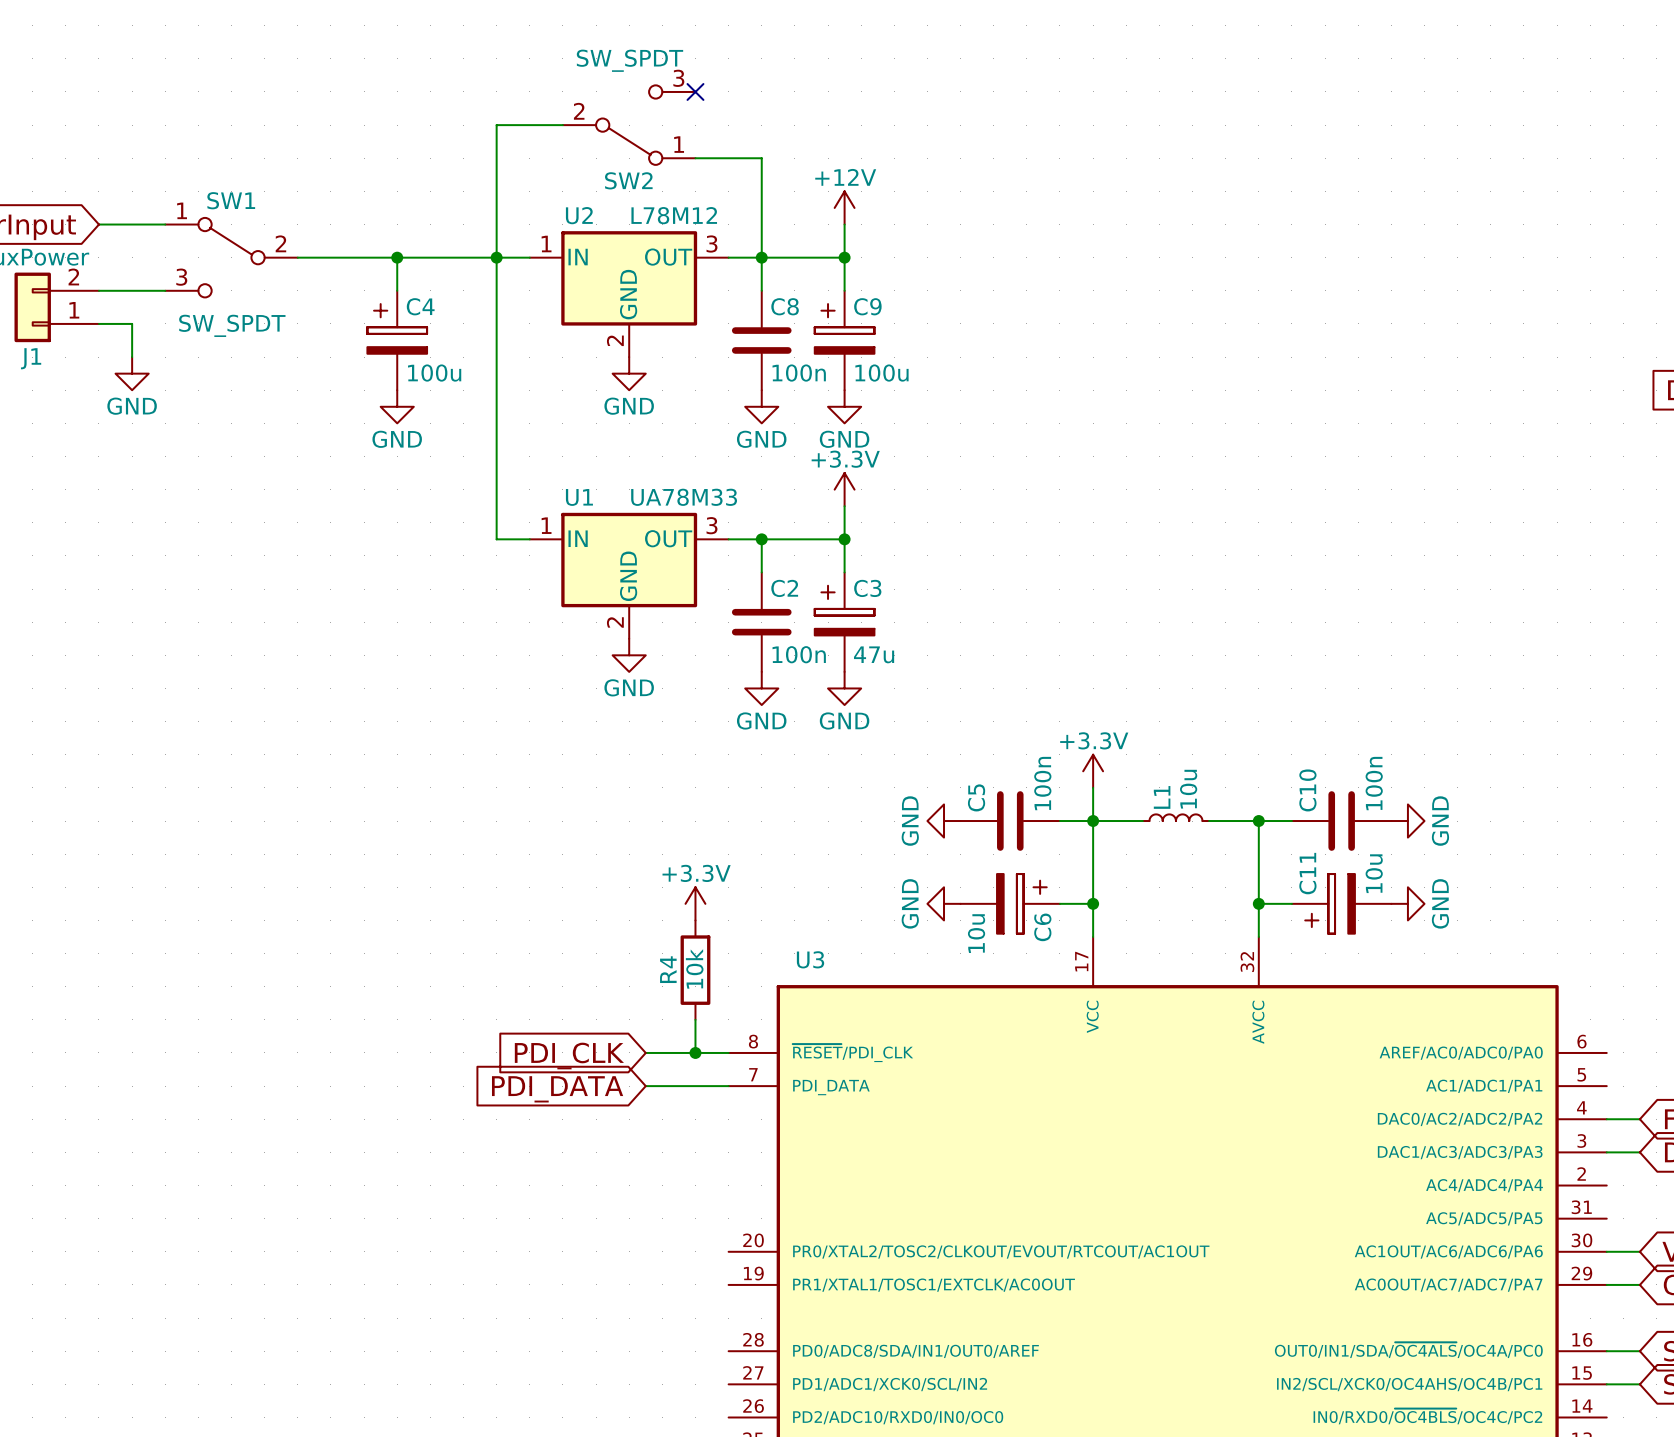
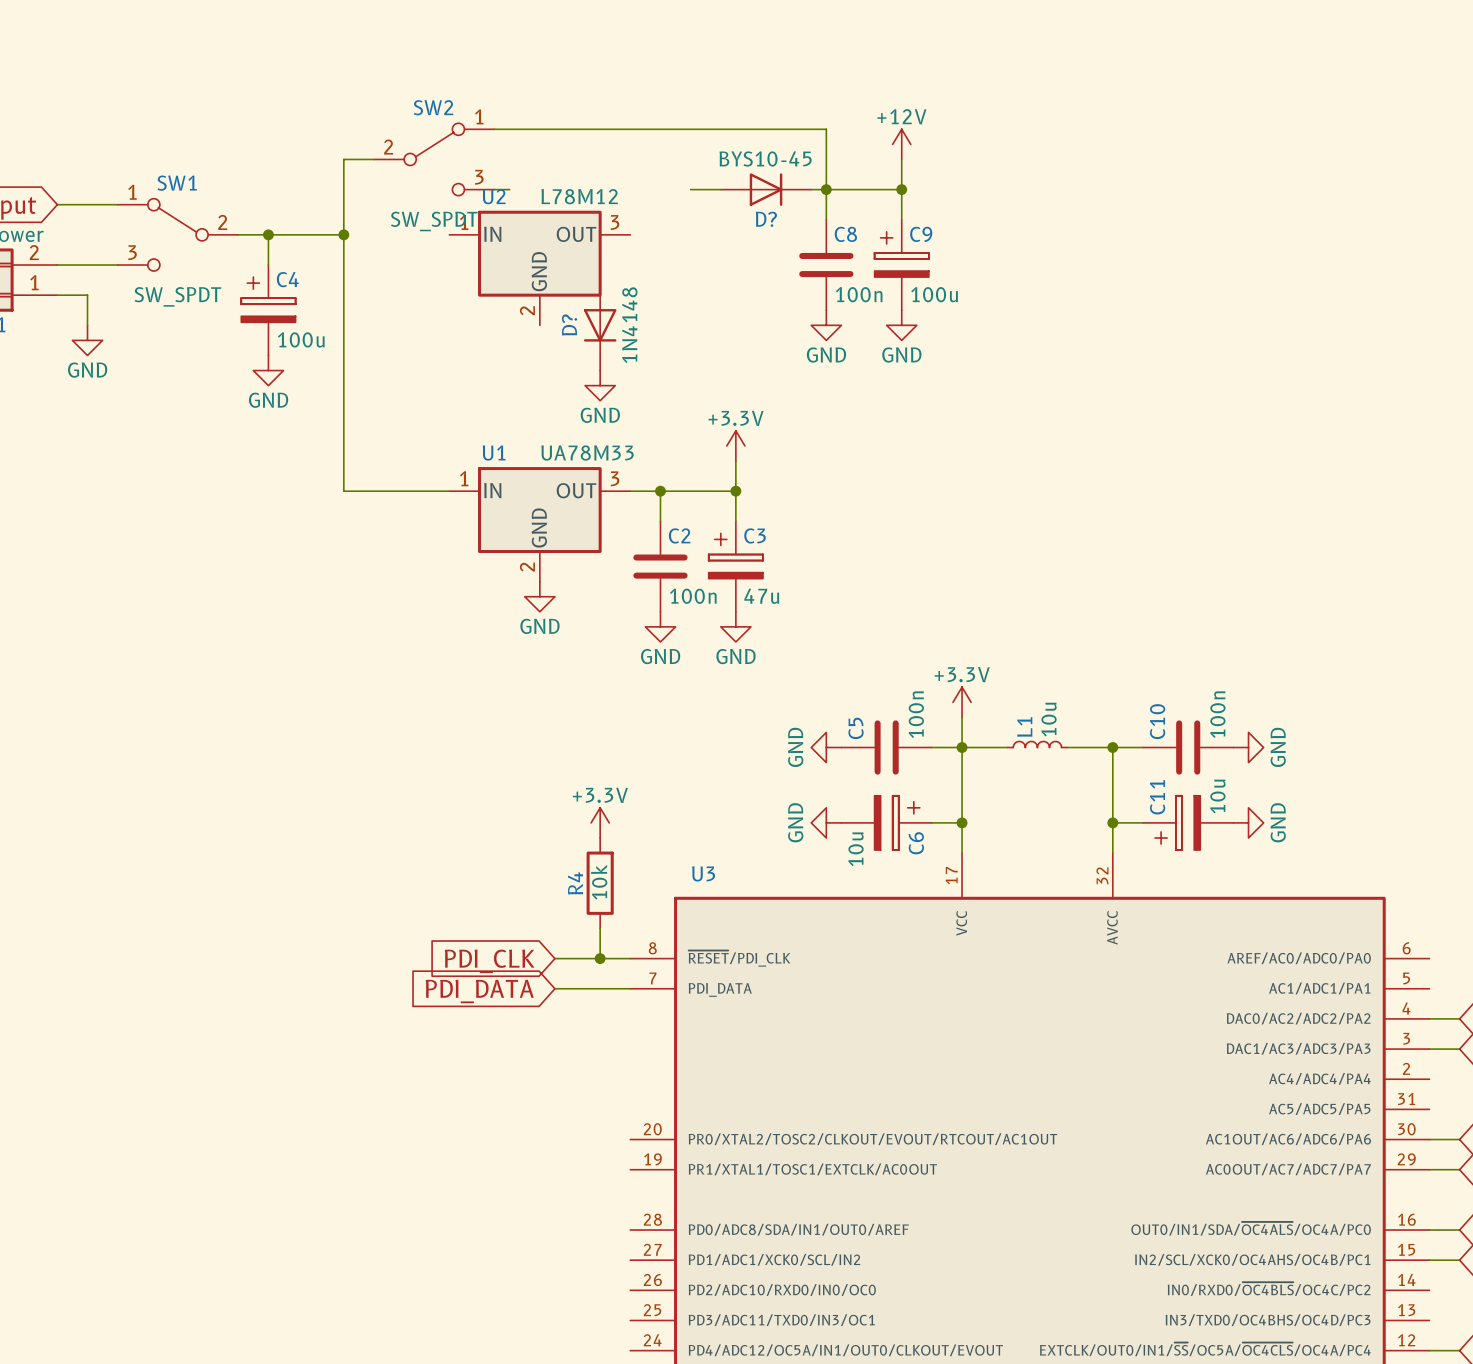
no-connect mark: (695, 91) -> none
wire: (562, 125) (496, 125) (496, 539) -> (373, 159) (343, 159) (343, 491) (419, 491)
SW2 flip: as is (629, 125) -> up-down (434, 159)
SW2 position: (629, 125) -> (434, 159)
wire: none -> (494, 129) (826, 129) (826, 219)
wire: (695, 158) (761, 158) (761, 290) -> none
wire: none -> (494, 189) (509, 189)
wire: none -> (690, 189) (720, 189)
power symbol position: +12V (844, 207) -> +12V (901, 144)
D?: none -> BYS10-45 (766, 189)
wire: none -> (811, 189) (901, 189)
junction: none -> (826, 189)
junction: none -> (901, 189)
wire: (844, 224) (844, 290) -> (901, 159) (901, 219)
junction: none -> (268, 234)
wire: (397, 257) (397, 290) -> (268, 234) (268, 265)
junction position: (397, 257) -> (343, 234)
wire: (413, 257) (529, 257) -> none
junction: (496, 257) -> none
wire: (728, 257) (844, 257) -> none
junction: (761, 257) -> none
junction: (844, 257) -> none
C4 position: (397, 340) -> (268, 310)
C8 position: (761, 340) -> (826, 265)
C9 position: (844, 340) -> (901, 265)
D?: none -> 1N4148 (600, 325)
power symbol: none -> GND (826, 325)
power symbol: none -> GND (901, 325)
power symbol: GND (629, 373) -> none
power symbol position: GND (397, 406) -> GND (268, 370)
power symbol: GND (761, 406) -> none
power symbol: GND (844, 406) -> none
power symbol: none -> GND (600, 385)

